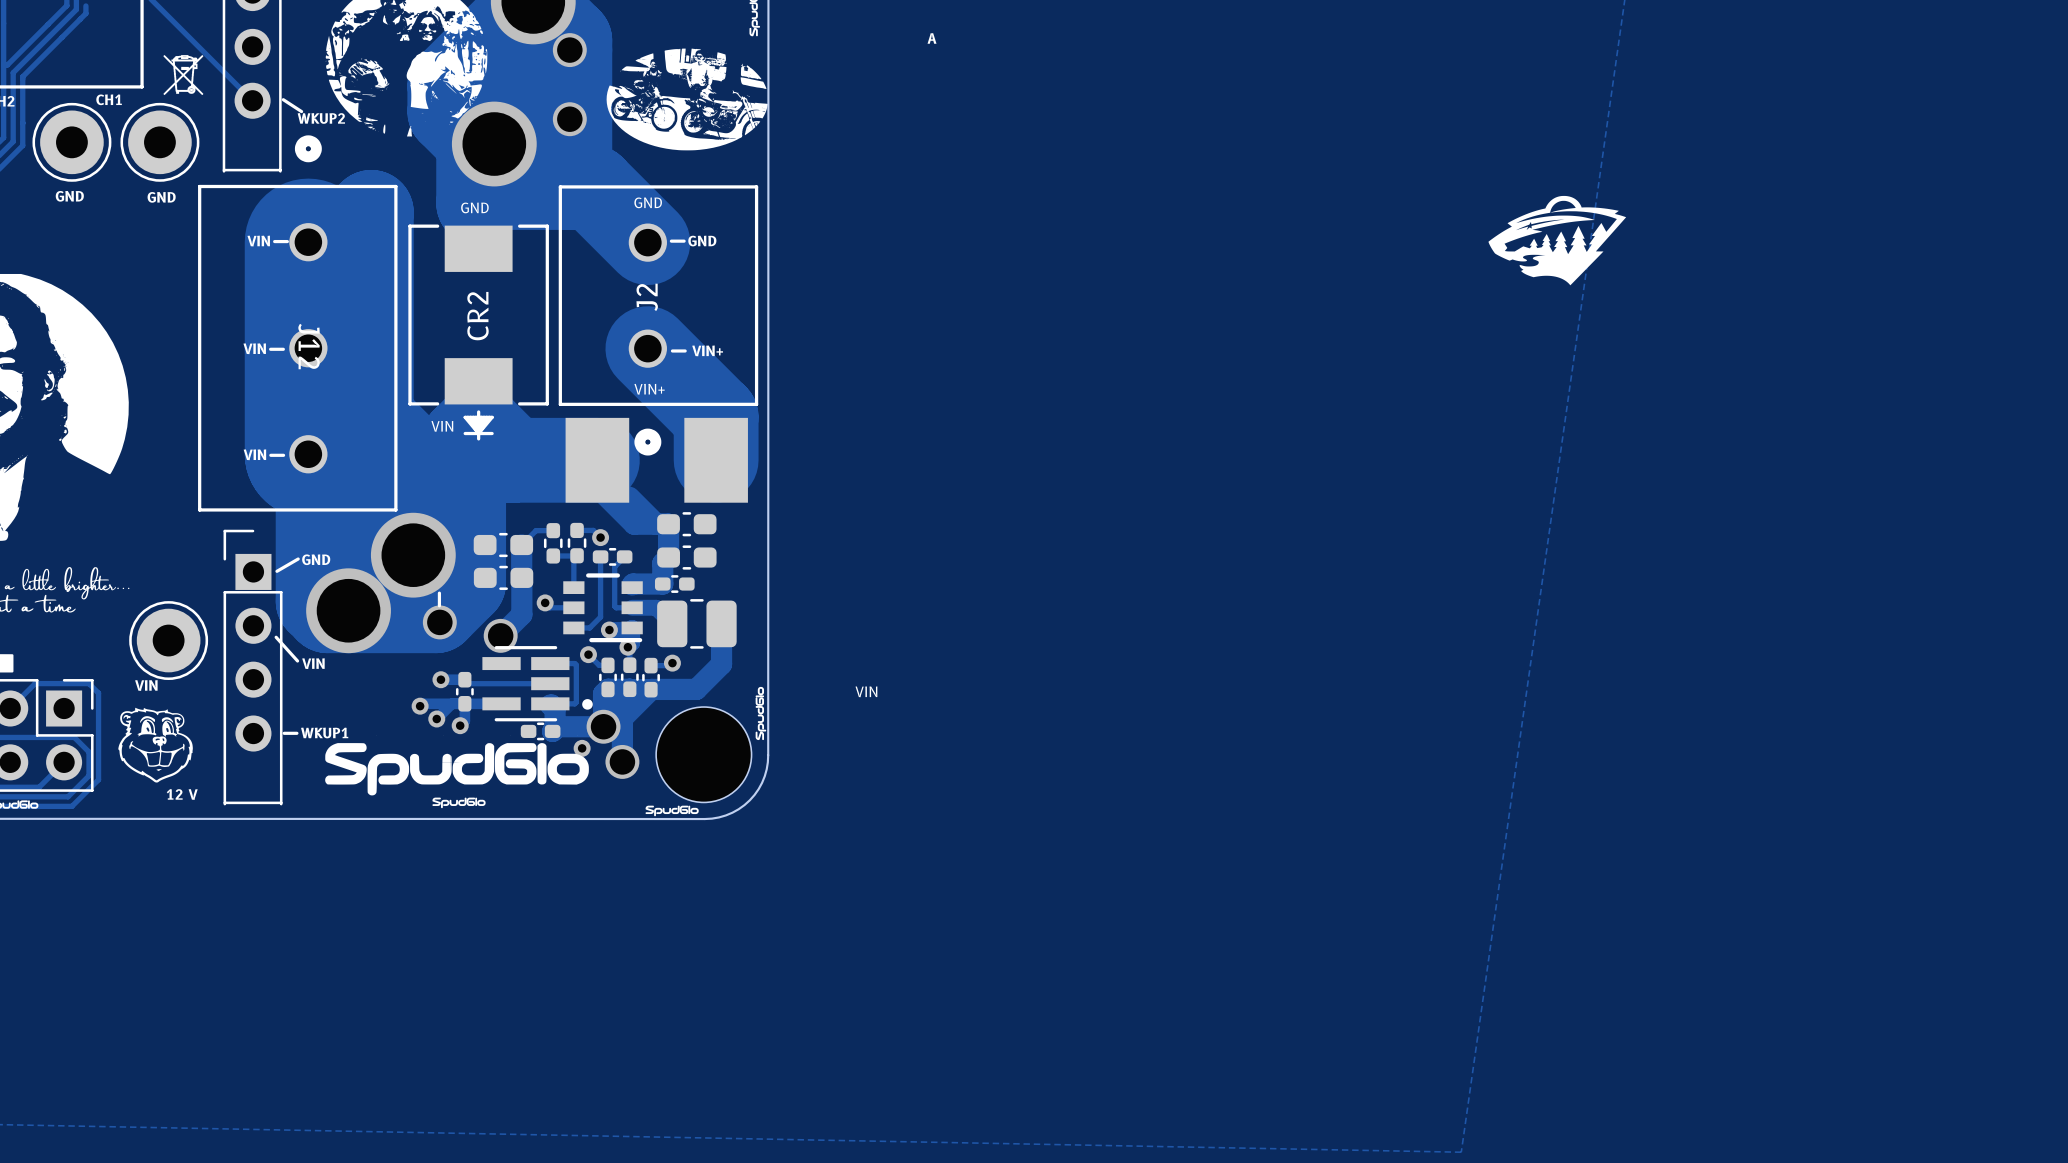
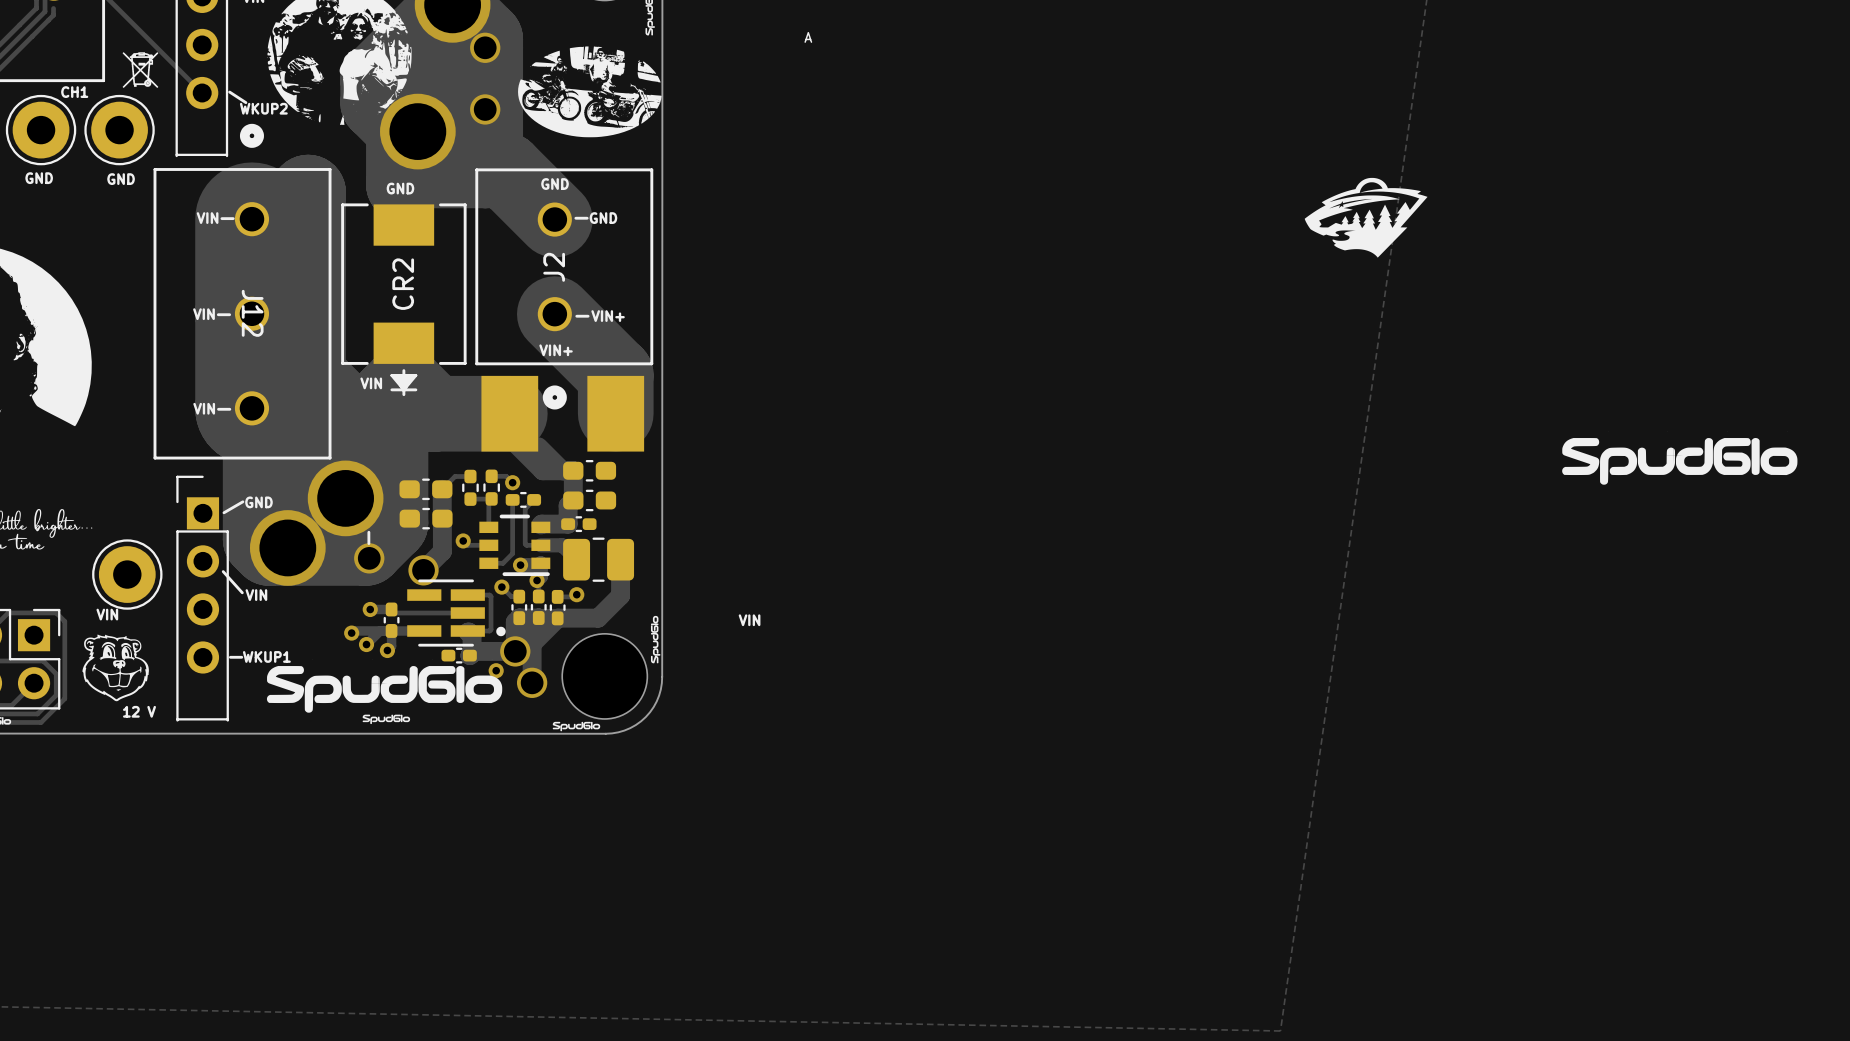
drawing: none -> [1562, 431, 1798, 485]

